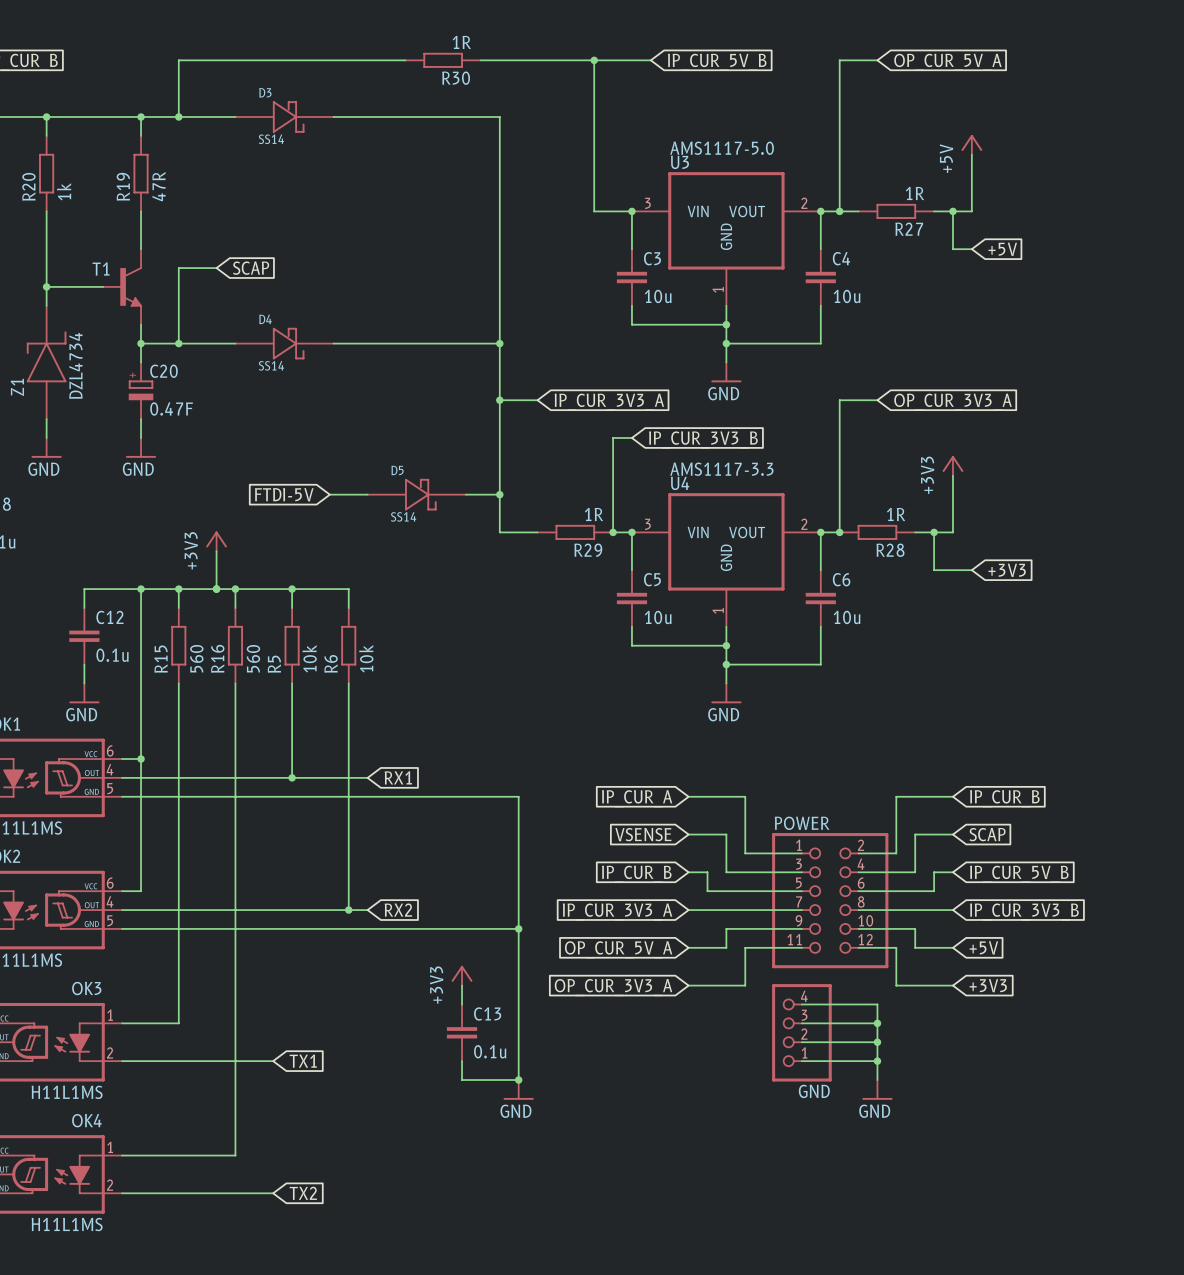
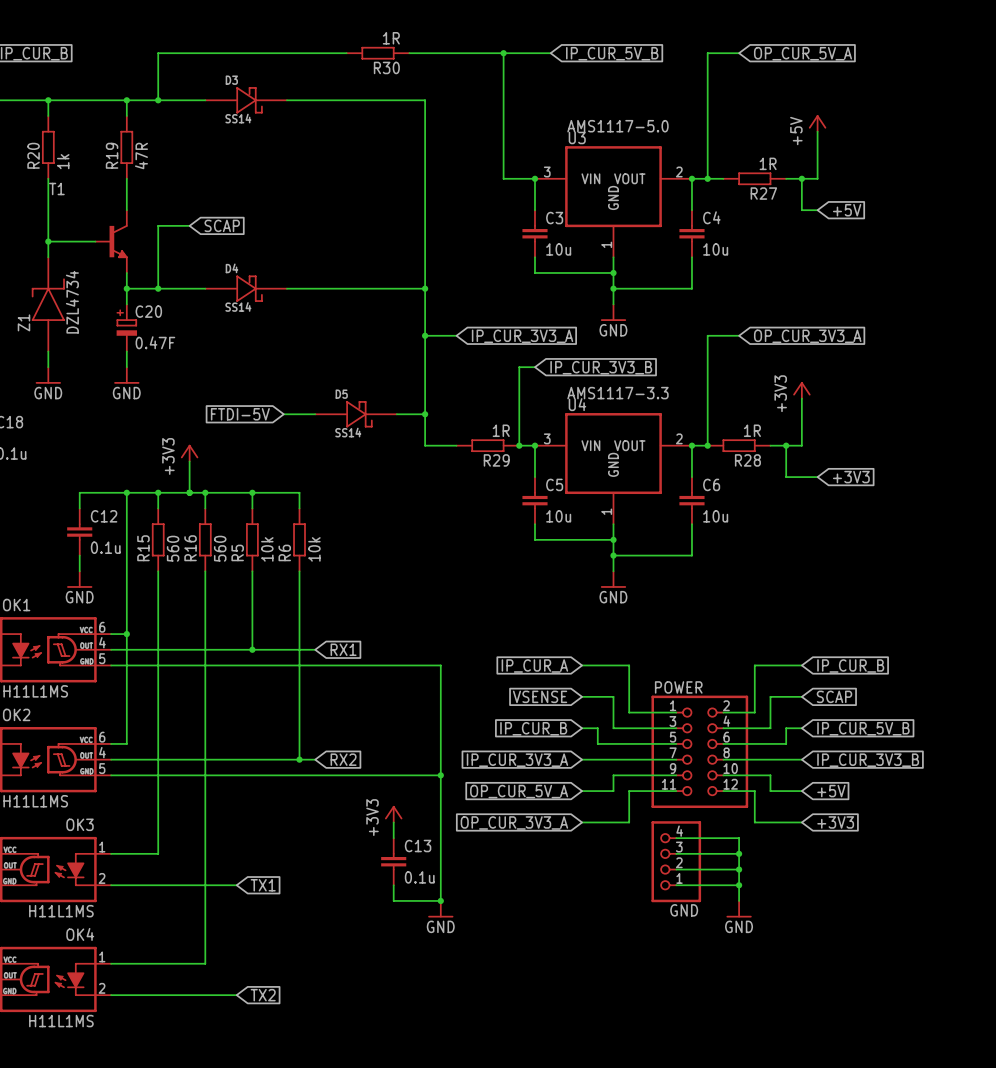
T1 name position: T1 (101, 269) -> T1 (56, 189)

